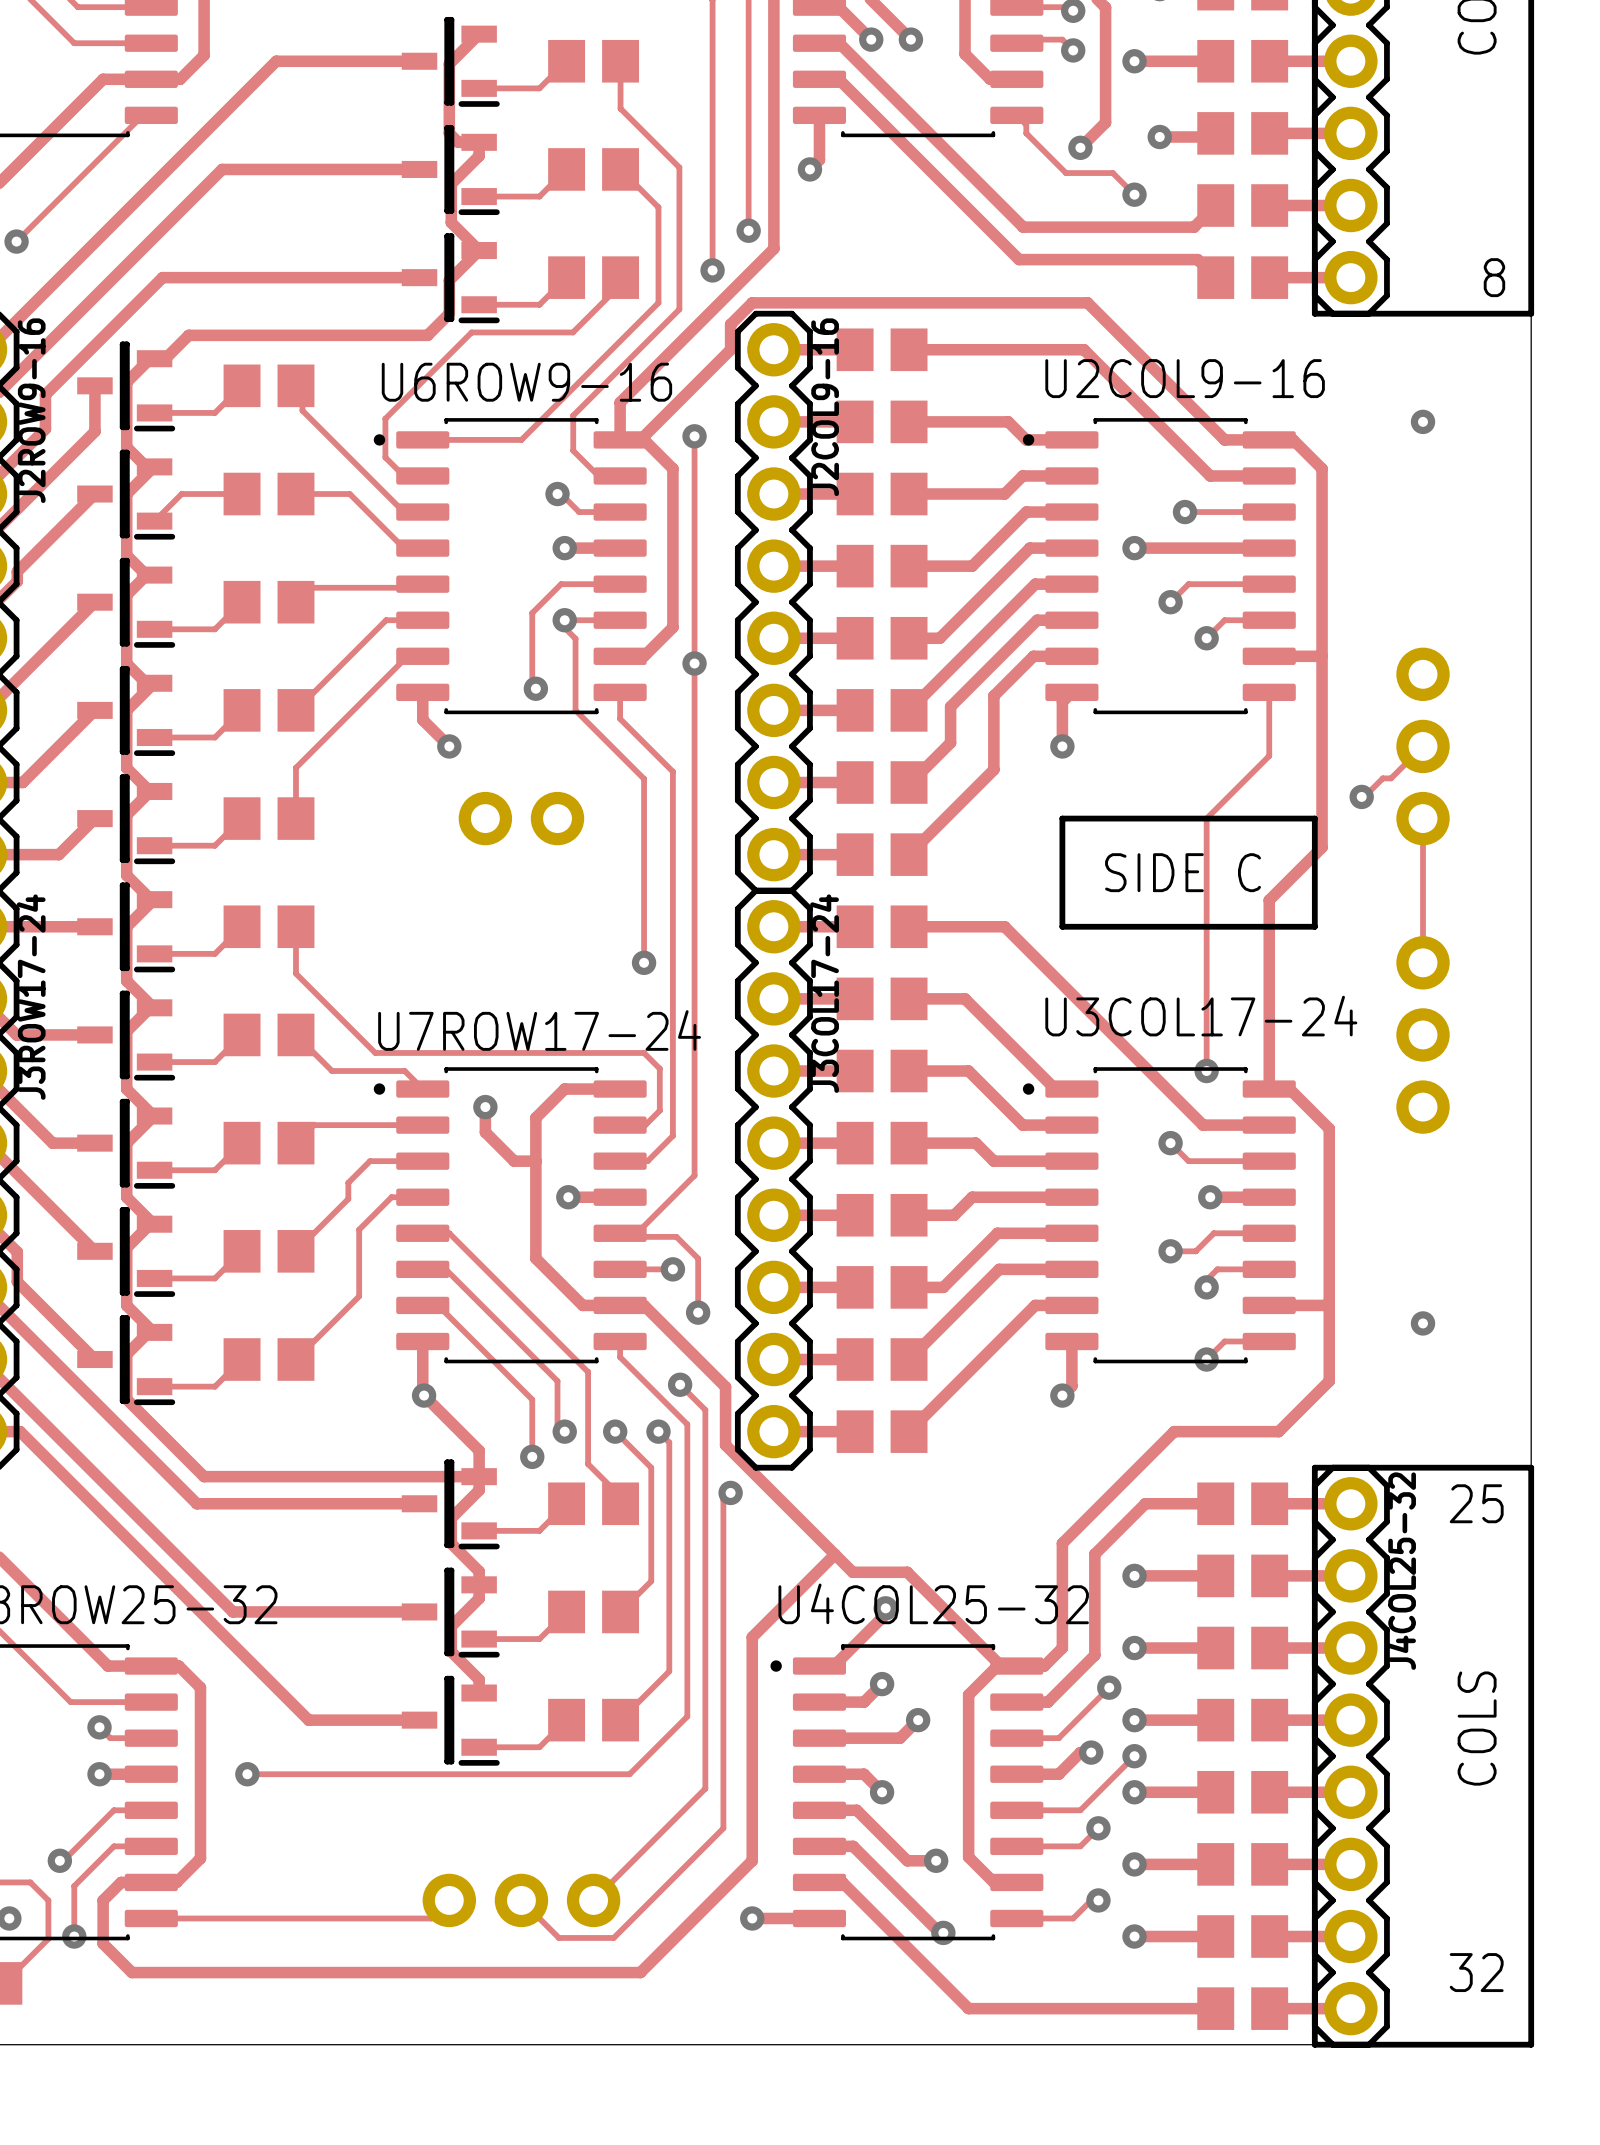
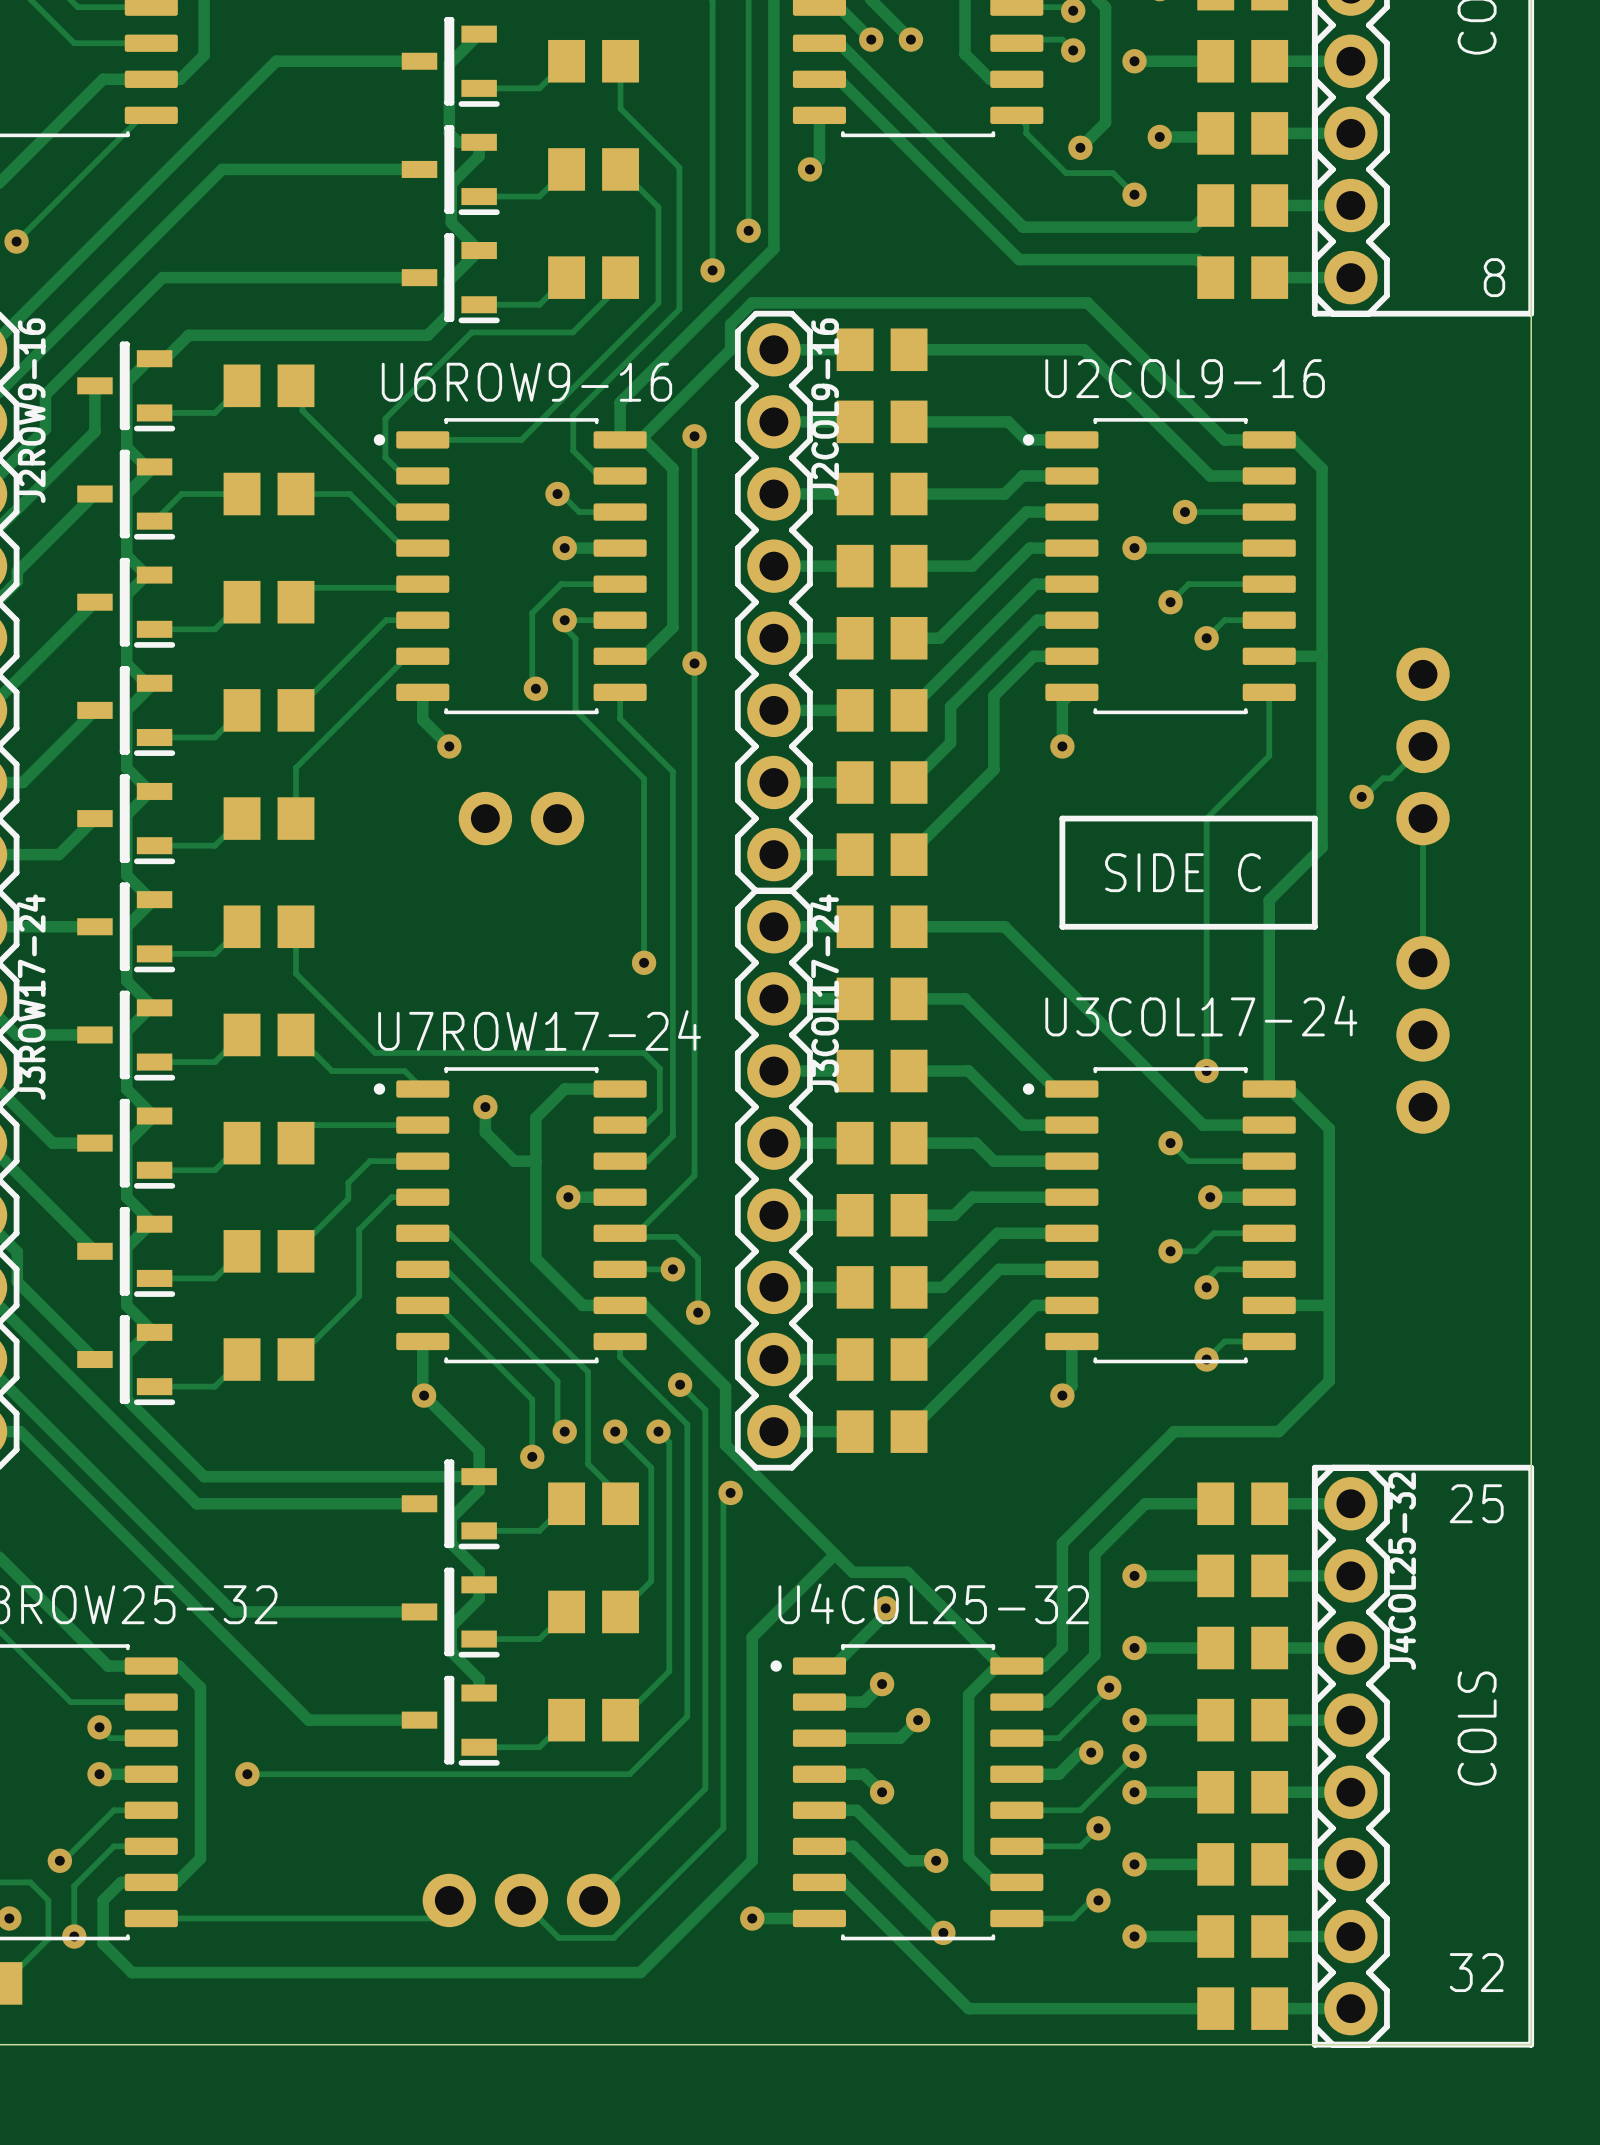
via: (1423, 421) -> none
via: (1423, 1323) -> none

